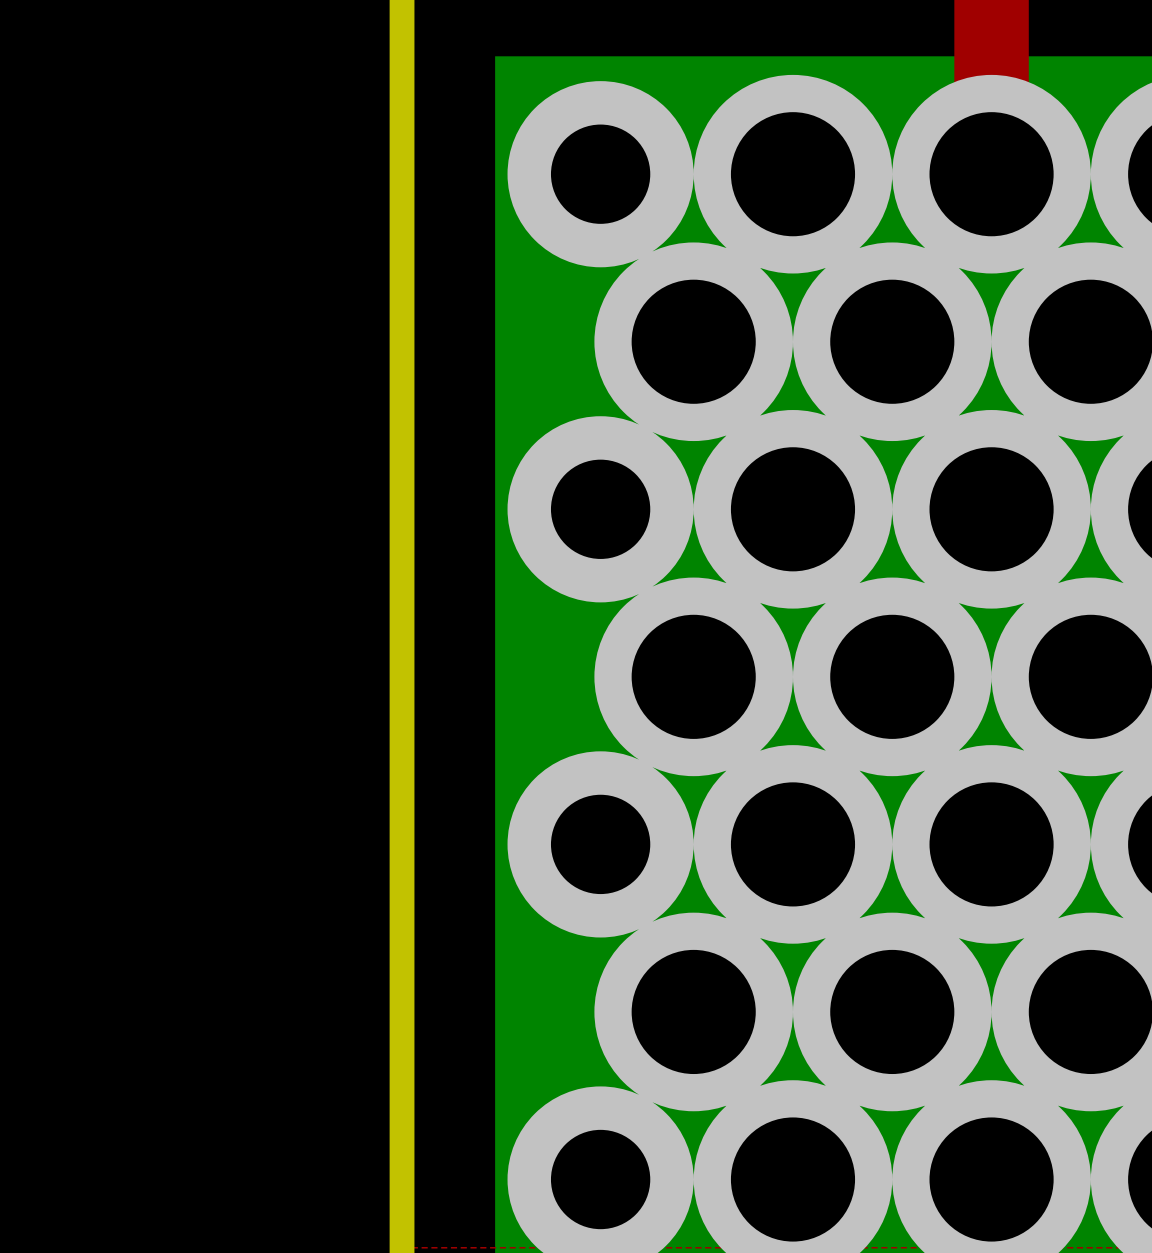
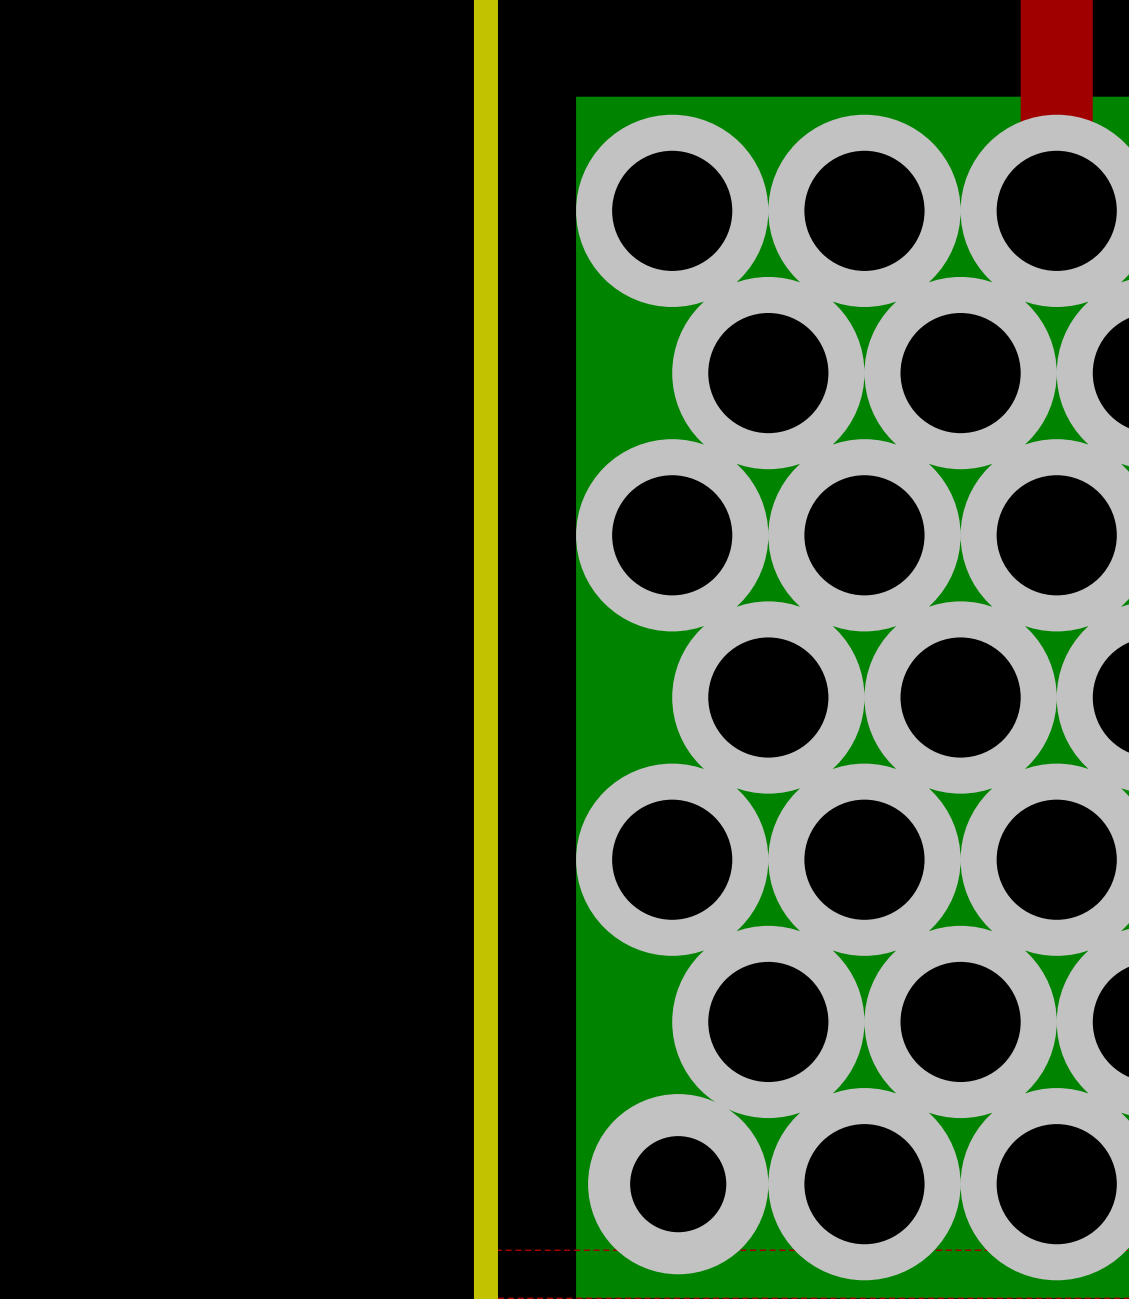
via size: [507, 81, 694, 268] -> [576, 114, 769, 307]
via size: [507, 416, 694, 603] -> [576, 439, 769, 632]
via size: [507, 751, 694, 938] -> [576, 763, 769, 956]

